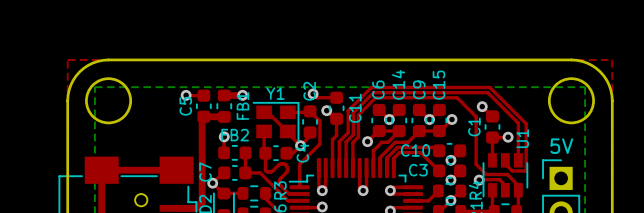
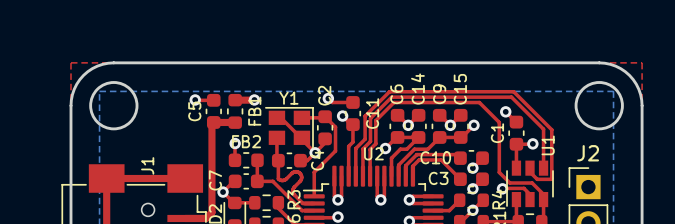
U2 name: none -> U2 (373, 153)
5V name: 5V (561, 146) -> J2 (588, 153)
J1 name: none -> J1 (147, 165)

